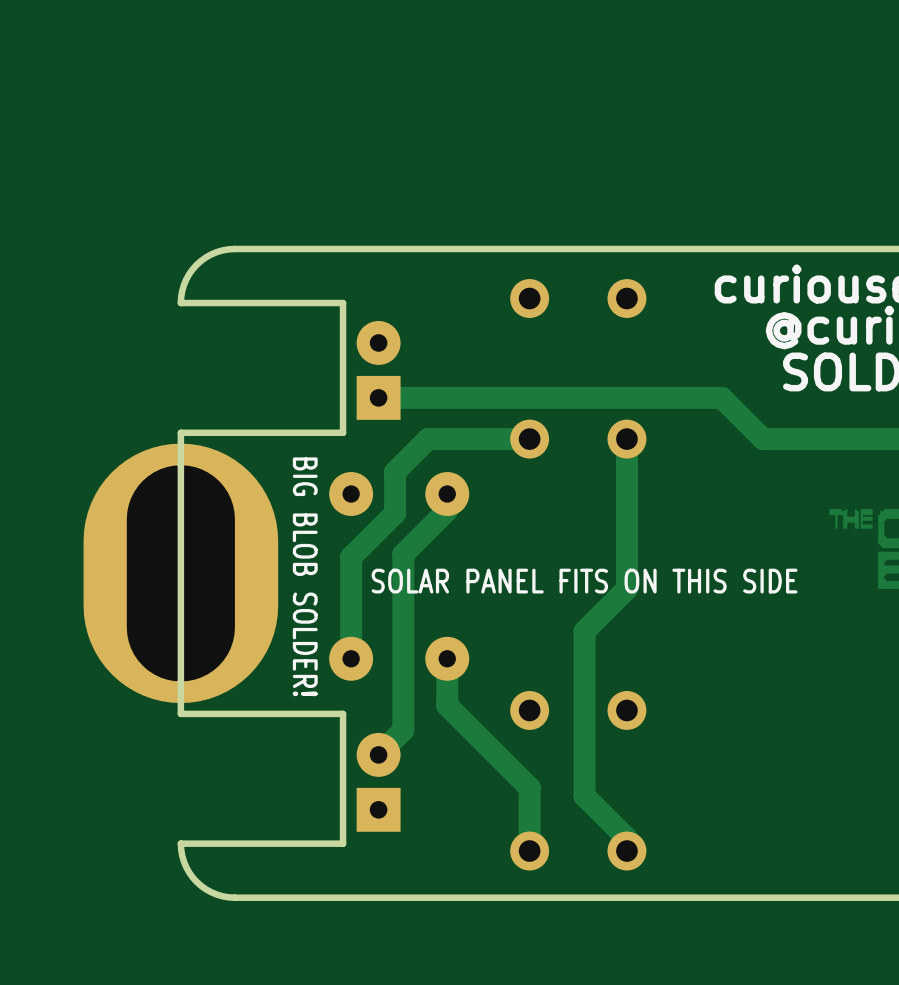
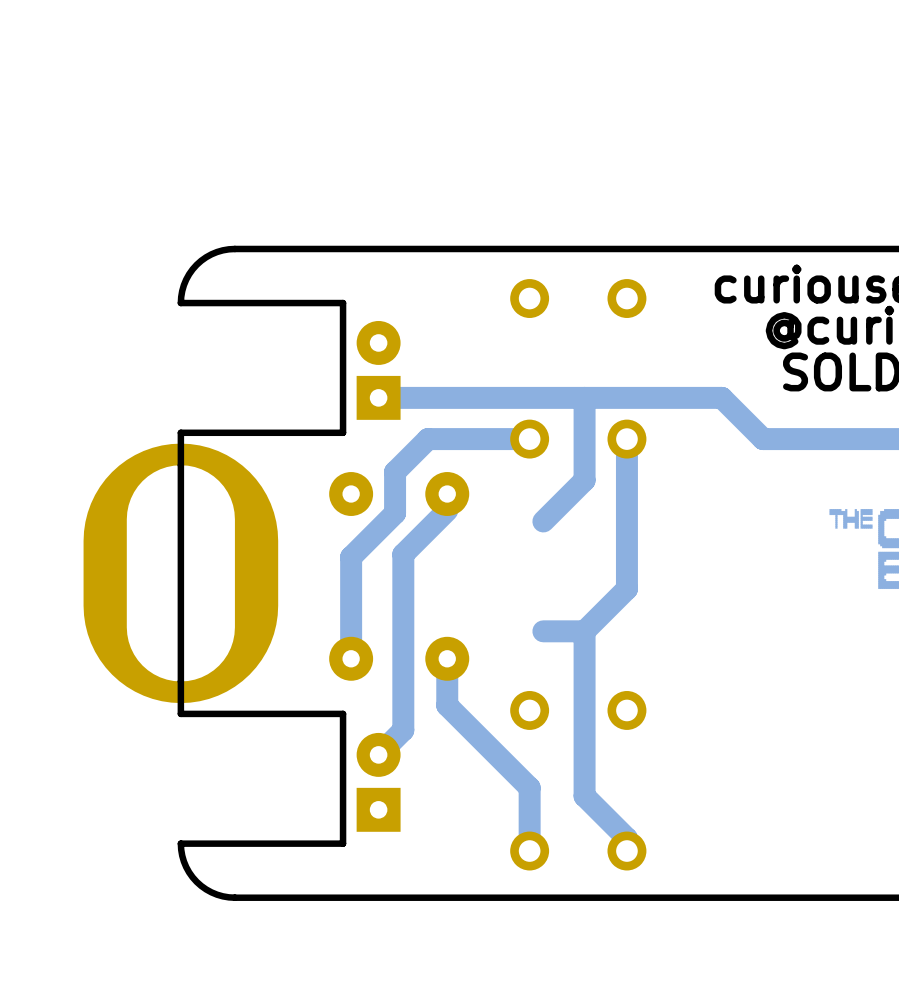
track: none -> (584, 397) (584, 480) (543, 521)
text: BIG BLOB SOLDER! (305, 576) -> none
text: SOLAR PANEL FITS ON THIS SIDE (584, 581) -> none
track: none -> (584, 631) (543, 631)

